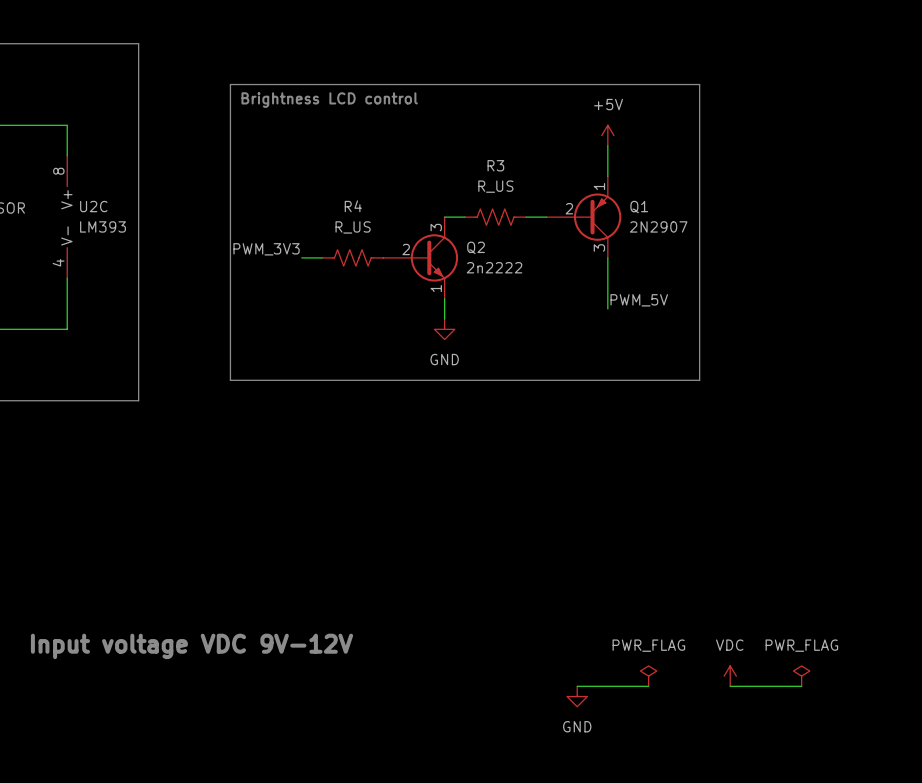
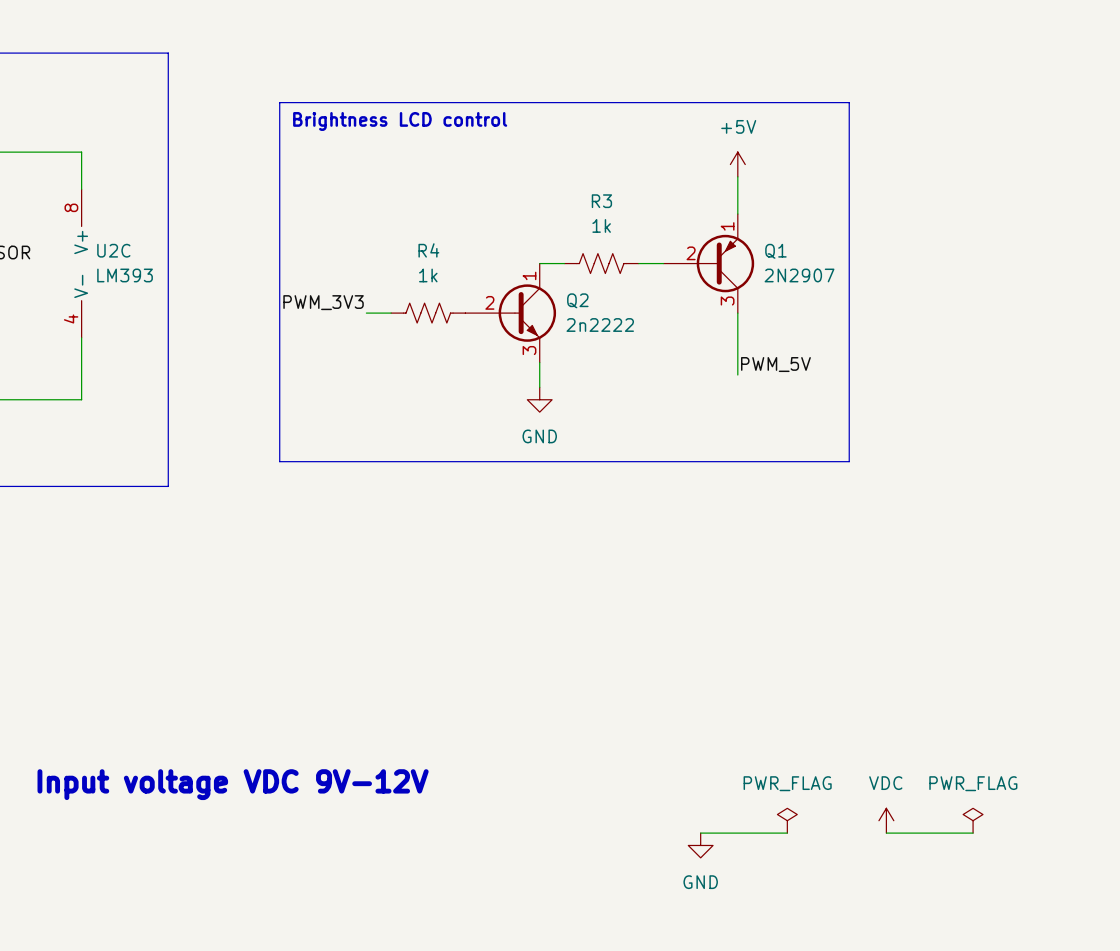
R3 value: R_US (495, 186) -> 1k (601, 225)
Q2 symbol: [383, 217, 459, 299] -> [465, 263, 557, 363]
R4 value: R_US (353, 227) -> 1k (428, 275)

